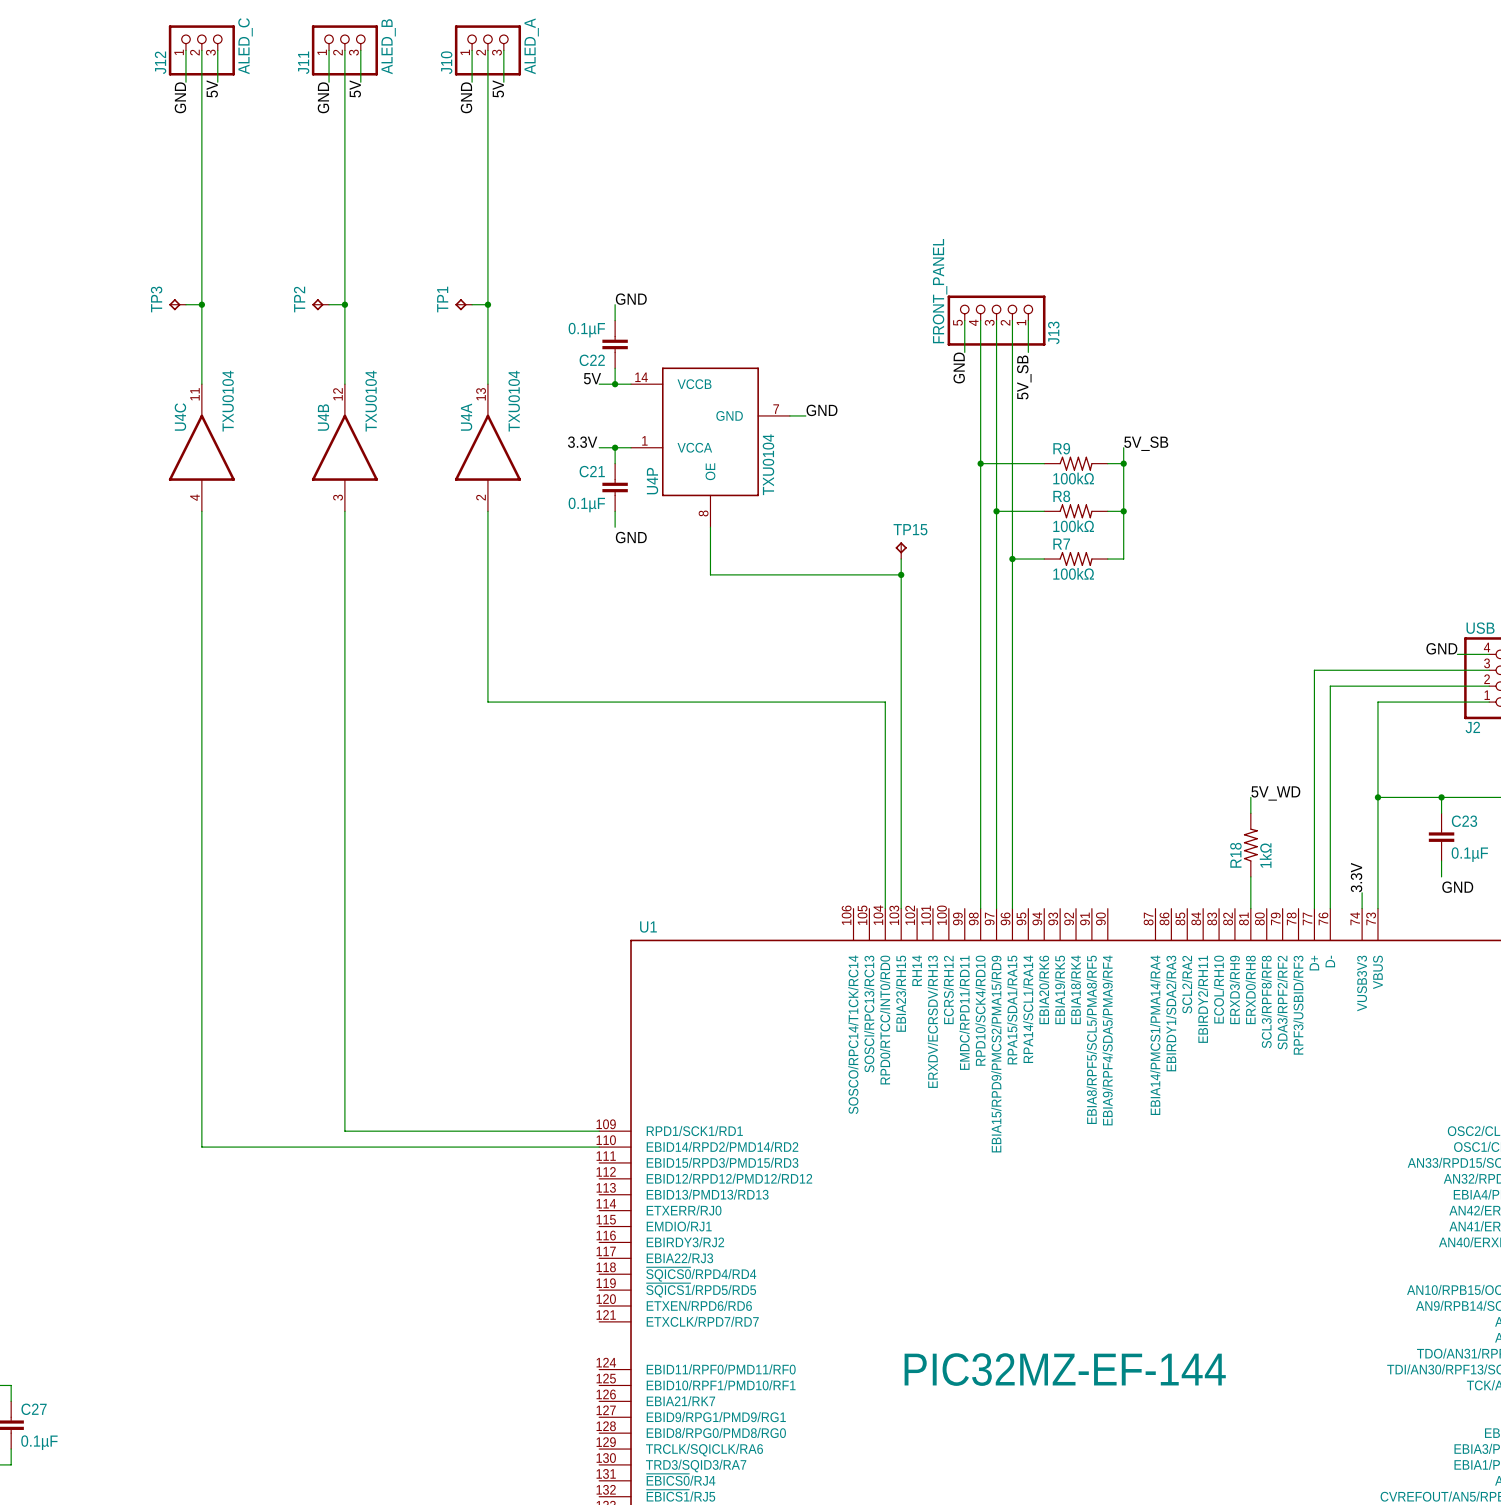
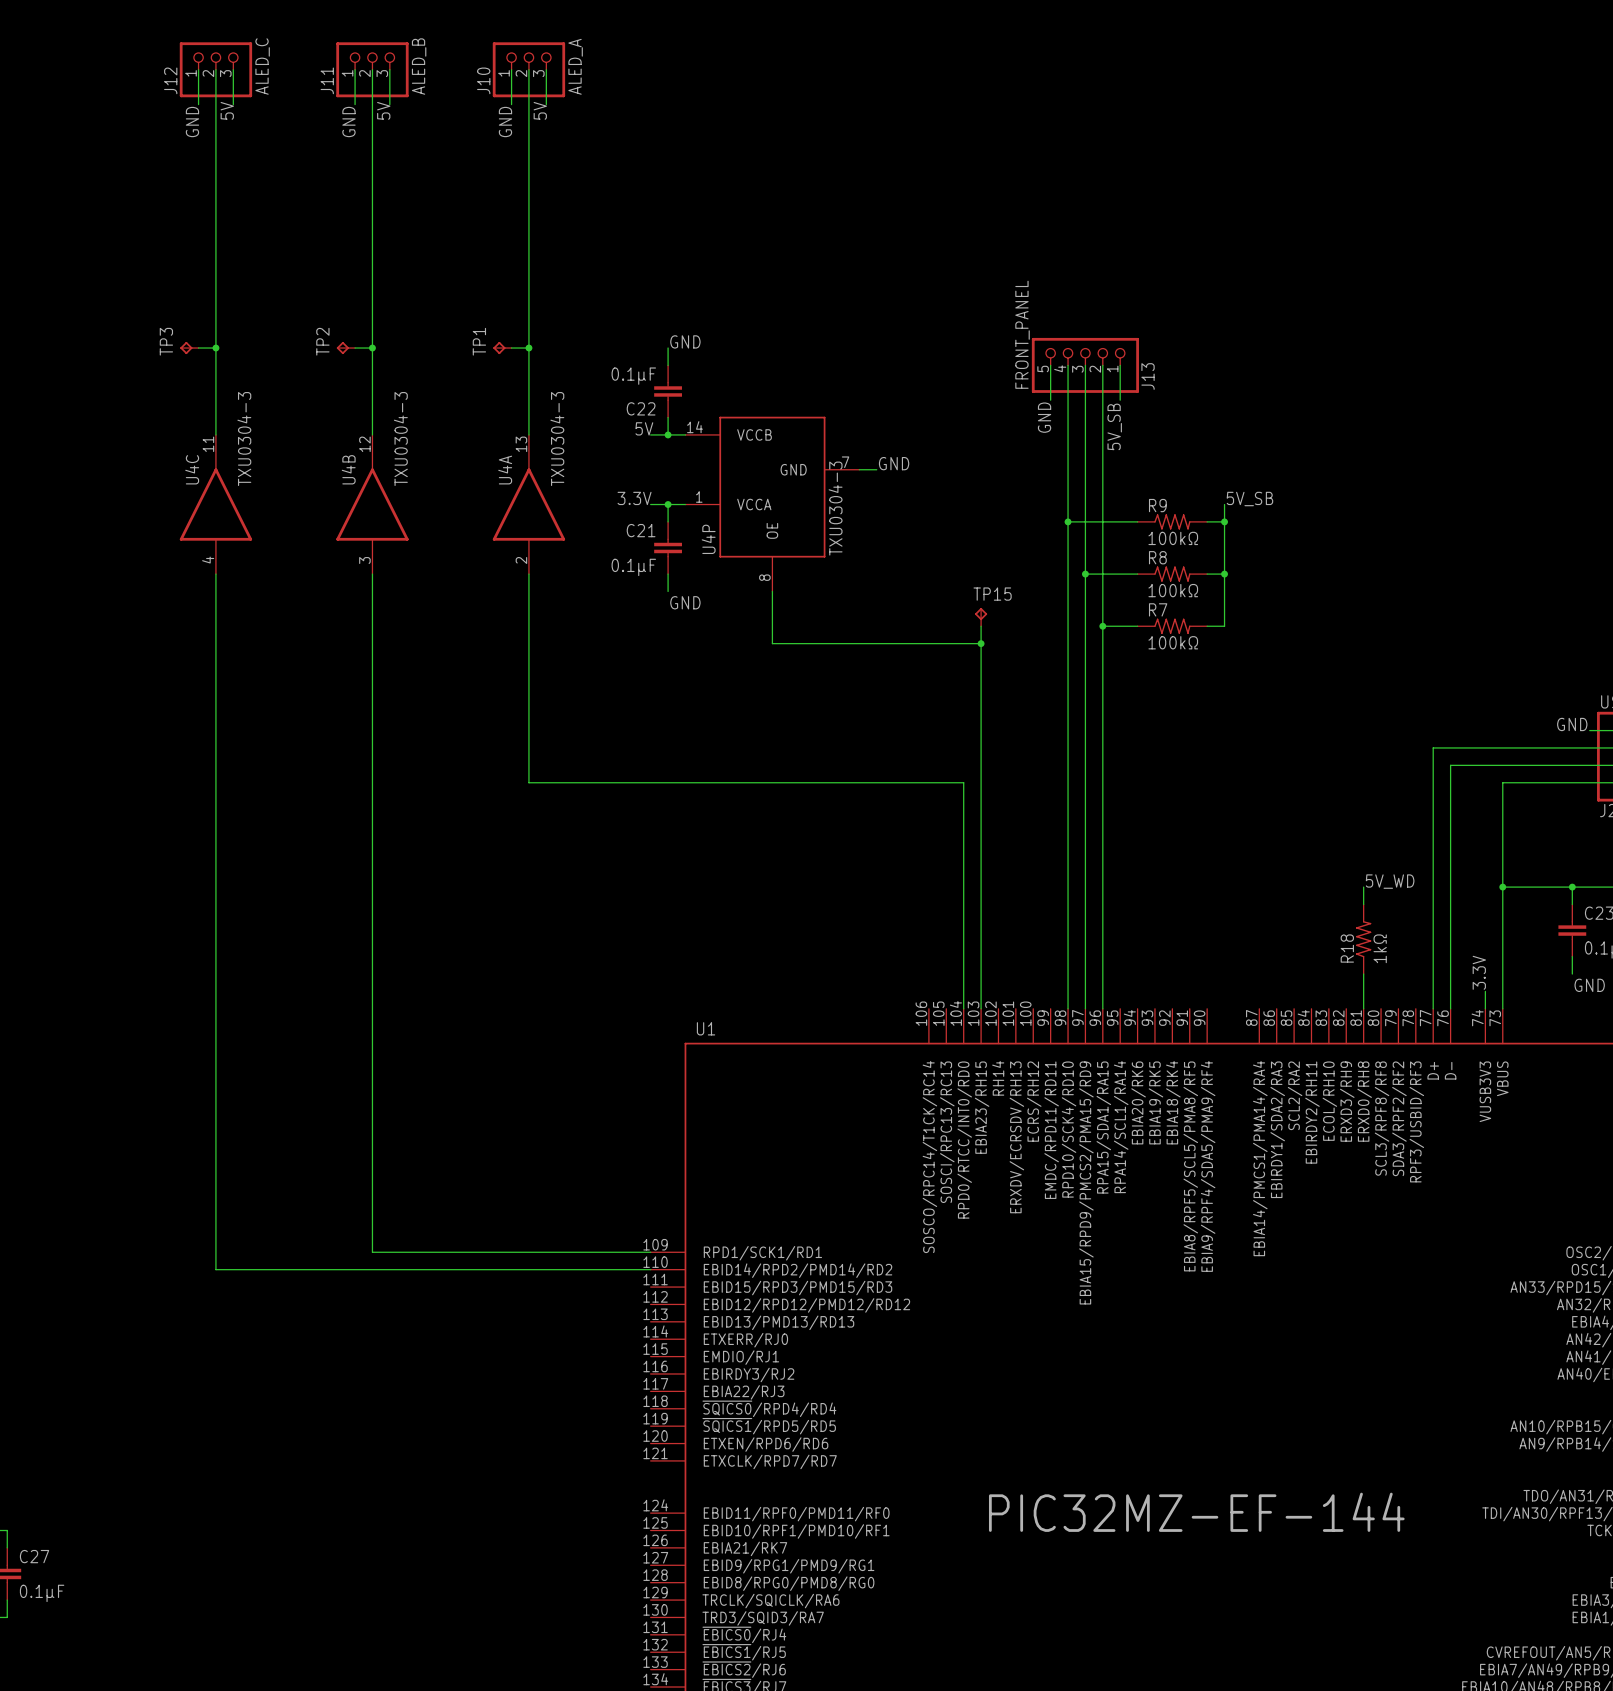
U4C value: TXU0104 (228, 401) -> TXU0304-3 (244, 439)
U4B value: TXU0104 (371, 401) -> TXU0304-3 (400, 439)
U4A value: TXU0104 (514, 401) -> TXU0304-3 (557, 439)
U4P value: TXU0104 (768, 464) -> TXU0304-3 (835, 508)

